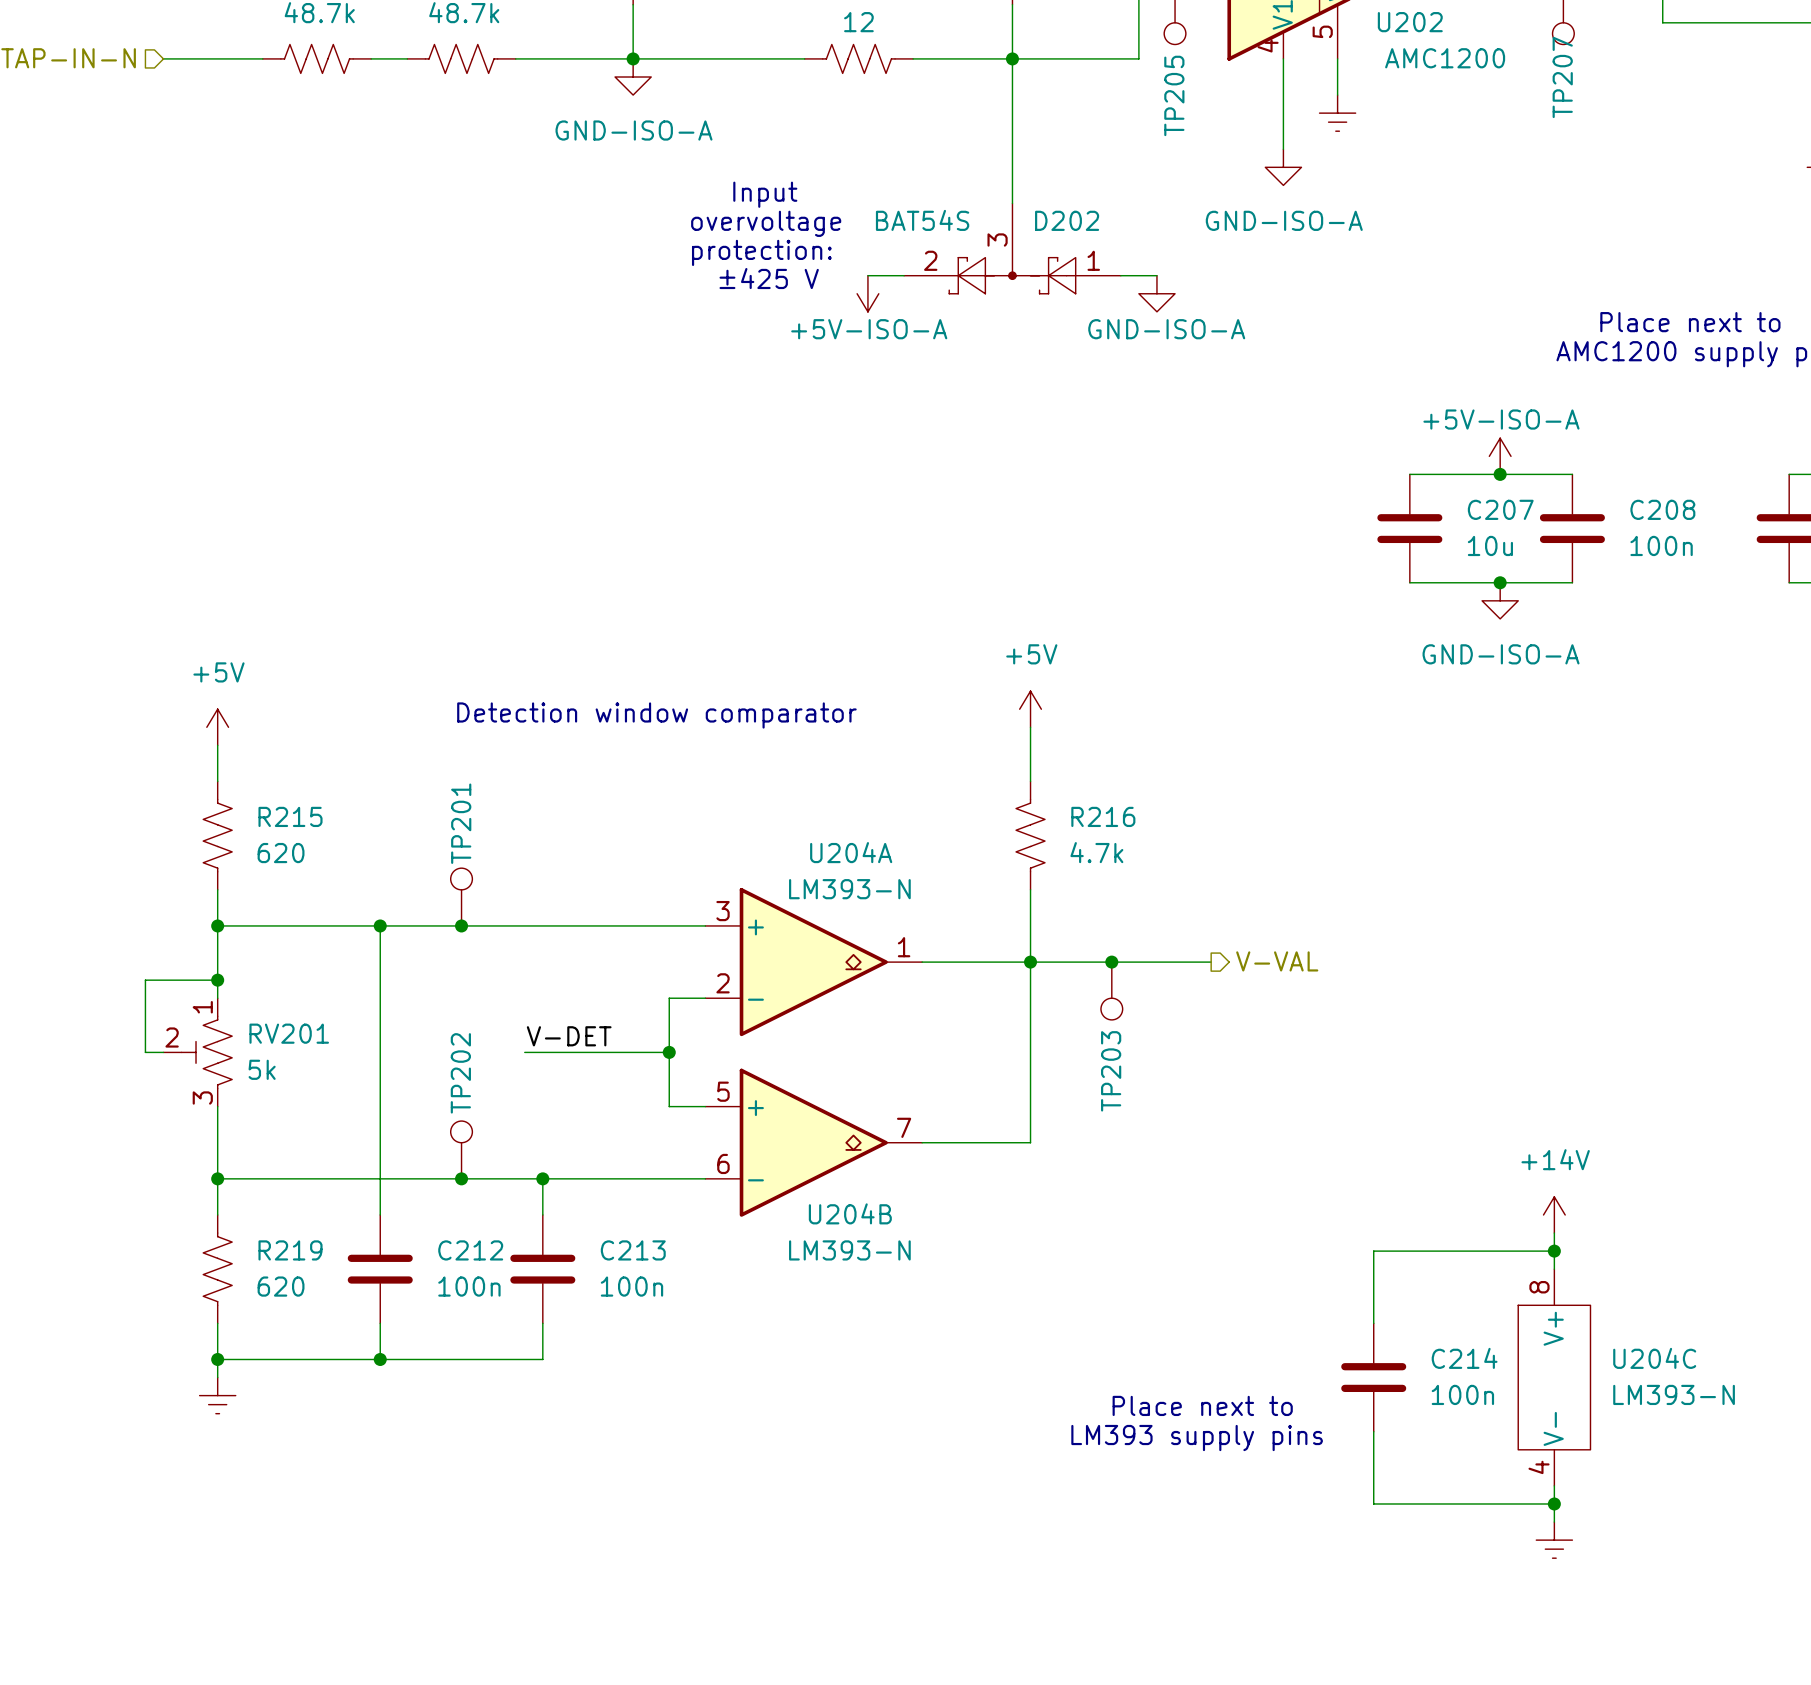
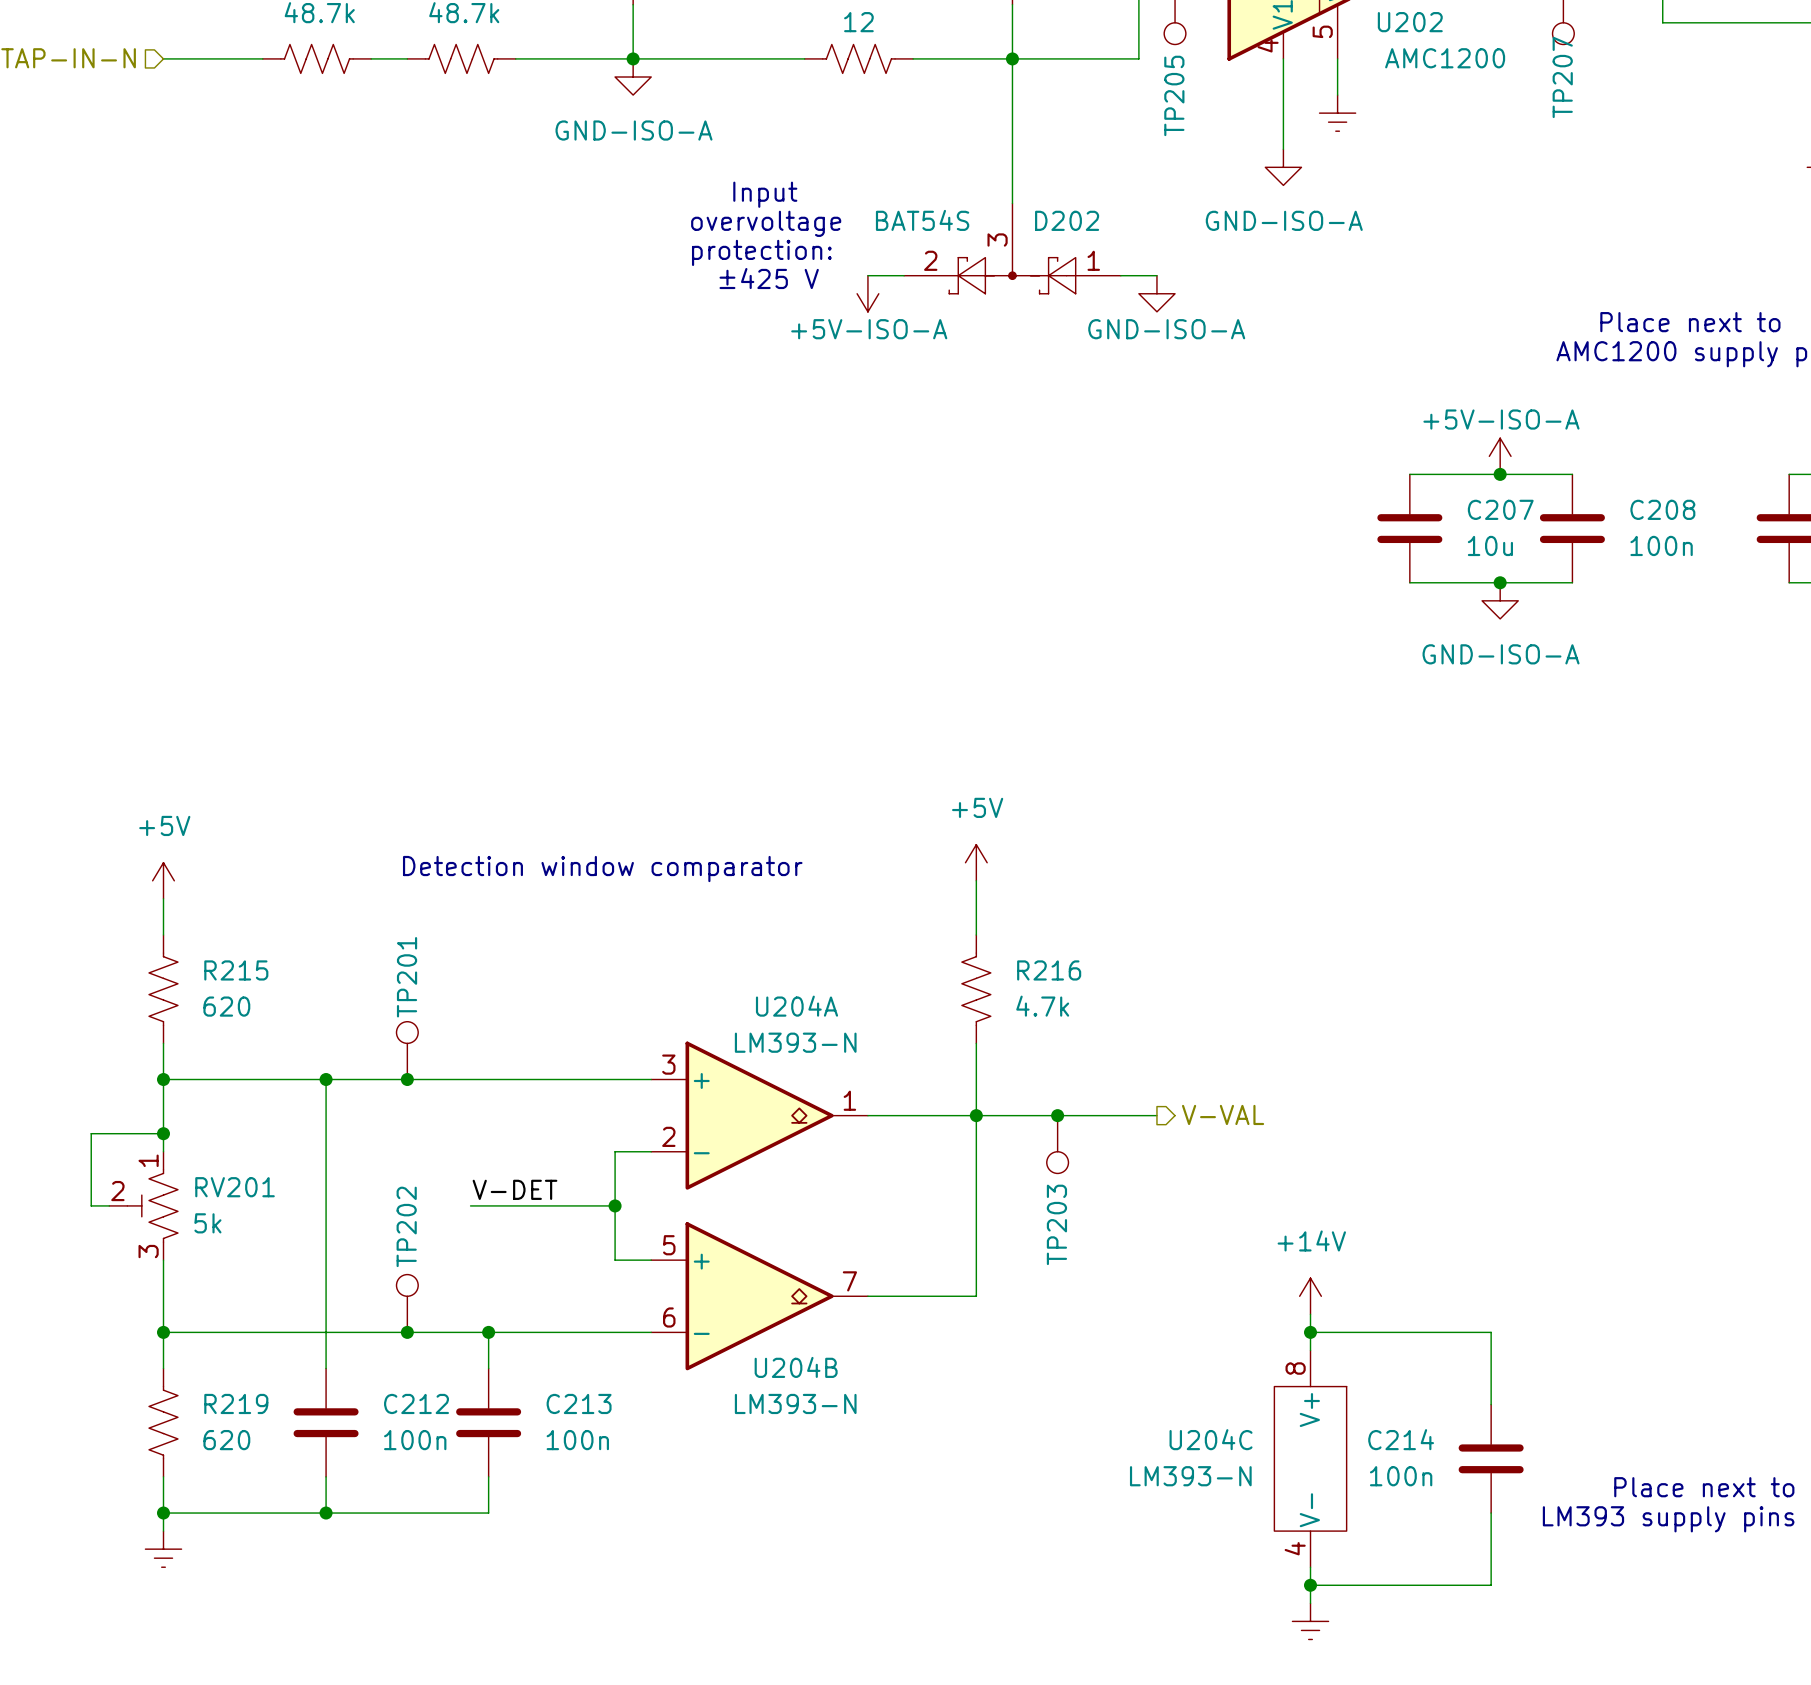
power symbol position: +5V (1030, 709) -> +5V (976, 862)
text position: Detection window comparator (656, 715) -> Detection window comparator (602, 869)
power symbol position: +5V (217, 727) -> +5V (163, 880)
wire: (1030, 727) (1030, 781) -> (976, 880) (976, 935)
wire: (217, 745) (217, 781) -> (163, 898) (163, 935)
R215 position: (217, 835) -> (163, 989)
R216 position: (1030, 835) -> (976, 989)
wire: (217, 889) (217, 998) -> (163, 1043) (163, 1151)
wire: (1030, 889) (1030, 1142) (922, 1142) -> (976, 1043) (976, 1296) (867, 1296)
TP201 position: (461, 897) -> (407, 1050)
wire: (217, 925) (705, 925) -> (163, 1079) (651, 1079)
junction: (217, 925) -> none
wire: (380, 925) (380, 1214) -> (326, 1079) (326, 1368)
junction: (380, 925) -> none
junction: (461, 925) -> none
hierarchical label position: V-VAL (1277, 961) -> V-VAL (1223, 1114)
U204A position: (813, 962) -> (759, 1115)
wire: (922, 962) (1211, 962) -> (867, 1115) (1156, 1115)
junction: (1030, 962) -> none
junction: (1111, 962) -> none
wire: (217, 980) (145, 980) (145, 1052) (163, 1052) -> (163, 1133) (91, 1133) (91, 1205) (109, 1205)
junction: (217, 980) -> none
TP203 position: (1111, 991) -> (1057, 1144)
wire: (705, 998) (669, 998) (669, 1106) (705, 1106) -> (651, 1151) (615, 1151) (615, 1260) (651, 1260)
label position: V-DET (569, 1036) -> V-DET (515, 1189)
RV201 position: (197, 1052) -> (143, 1205)
wire: (524, 1052) (669, 1052) -> (470, 1205) (615, 1205)
junction: (669, 1052) -> none
junction: none -> (163, 1079)
junction: none -> (326, 1079)
junction: none -> (407, 1079)
wire: (217, 1106) (217, 1214) -> (163, 1260) (163, 1368)
junction: none -> (976, 1115)
junction: none -> (1057, 1115)
junction: none -> (163, 1133)
U204B position: (813, 1142) -> (759, 1296)
TP202 position: (461, 1149) -> (407, 1303)
wire: (217, 1178) (705, 1178) -> (163, 1332) (651, 1332)
junction: (217, 1178) -> none
junction: (461, 1178) -> none
wire: (542, 1178) (542, 1214) -> (488, 1332) (488, 1368)
junction position: (542, 1178) -> (615, 1205)
power symbol position: +14V (1554, 1214) -> +14V (1310, 1296)
wire: (1554, 1233) (1554, 1269) -> (1310, 1314) (1310, 1350)
wire: (1554, 1251) (1373, 1251) (1373, 1323) -> none
junction: (1554, 1251) -> none
R219 position: (217, 1269) -> (163, 1422)
C212 position: (380, 1269) -> (326, 1422)
C213 position: (542, 1269) -> (488, 1422)
wire: (217, 1323) (217, 1377) -> (163, 1476) (163, 1531)
wire: (380, 1323) (380, 1359) -> (326, 1476) (326, 1513)
wire: (542, 1323) (542, 1359) (217, 1359) -> (488, 1476) (488, 1513) (163, 1513)
junction: none -> (488, 1332)
wire: none -> (1310, 1332) (1491, 1332) (1491, 1404)
junction: none -> (1310, 1332)
C214 name position: C214 (1464, 1358) -> C214 (1401, 1439)
U204C name position: U204C (1654, 1358) -> U204C (1211, 1439)
junction position: (217, 1359) -> (163, 1332)
junction position: (380, 1359) -> (407, 1332)
C214 position: (1373, 1377) -> (1491, 1458)
U204C position: (1554, 1377) -> (1310, 1458)
C214 value position: 100n (1462, 1394) -> 100n (1401, 1476)
U204C value position: LM393-N (1674, 1394) -> LM393-N (1190, 1476)
power symbol position: (217, 1395) -> (163, 1549)
text: Place next to (1202, 1405) -> none
wire: (1373, 1431) (1373, 1503) (1554, 1503) -> none
text: LM393 supply pins (1197, 1438) -> none
wire: (1554, 1485) (1554, 1522) -> (1310, 1567) (1310, 1603)
text: none -> Place next to (1704, 1487)
junction: (1554, 1503) -> none
junction: none -> (163, 1513)
junction: none -> (326, 1513)
wire: none -> (1491, 1513) (1491, 1585) (1310, 1585)
text: none -> LM393 supply pins (1668, 1519)
power symbol position: (1554, 1540) -> (1310, 1621)
junction: none -> (1310, 1585)

